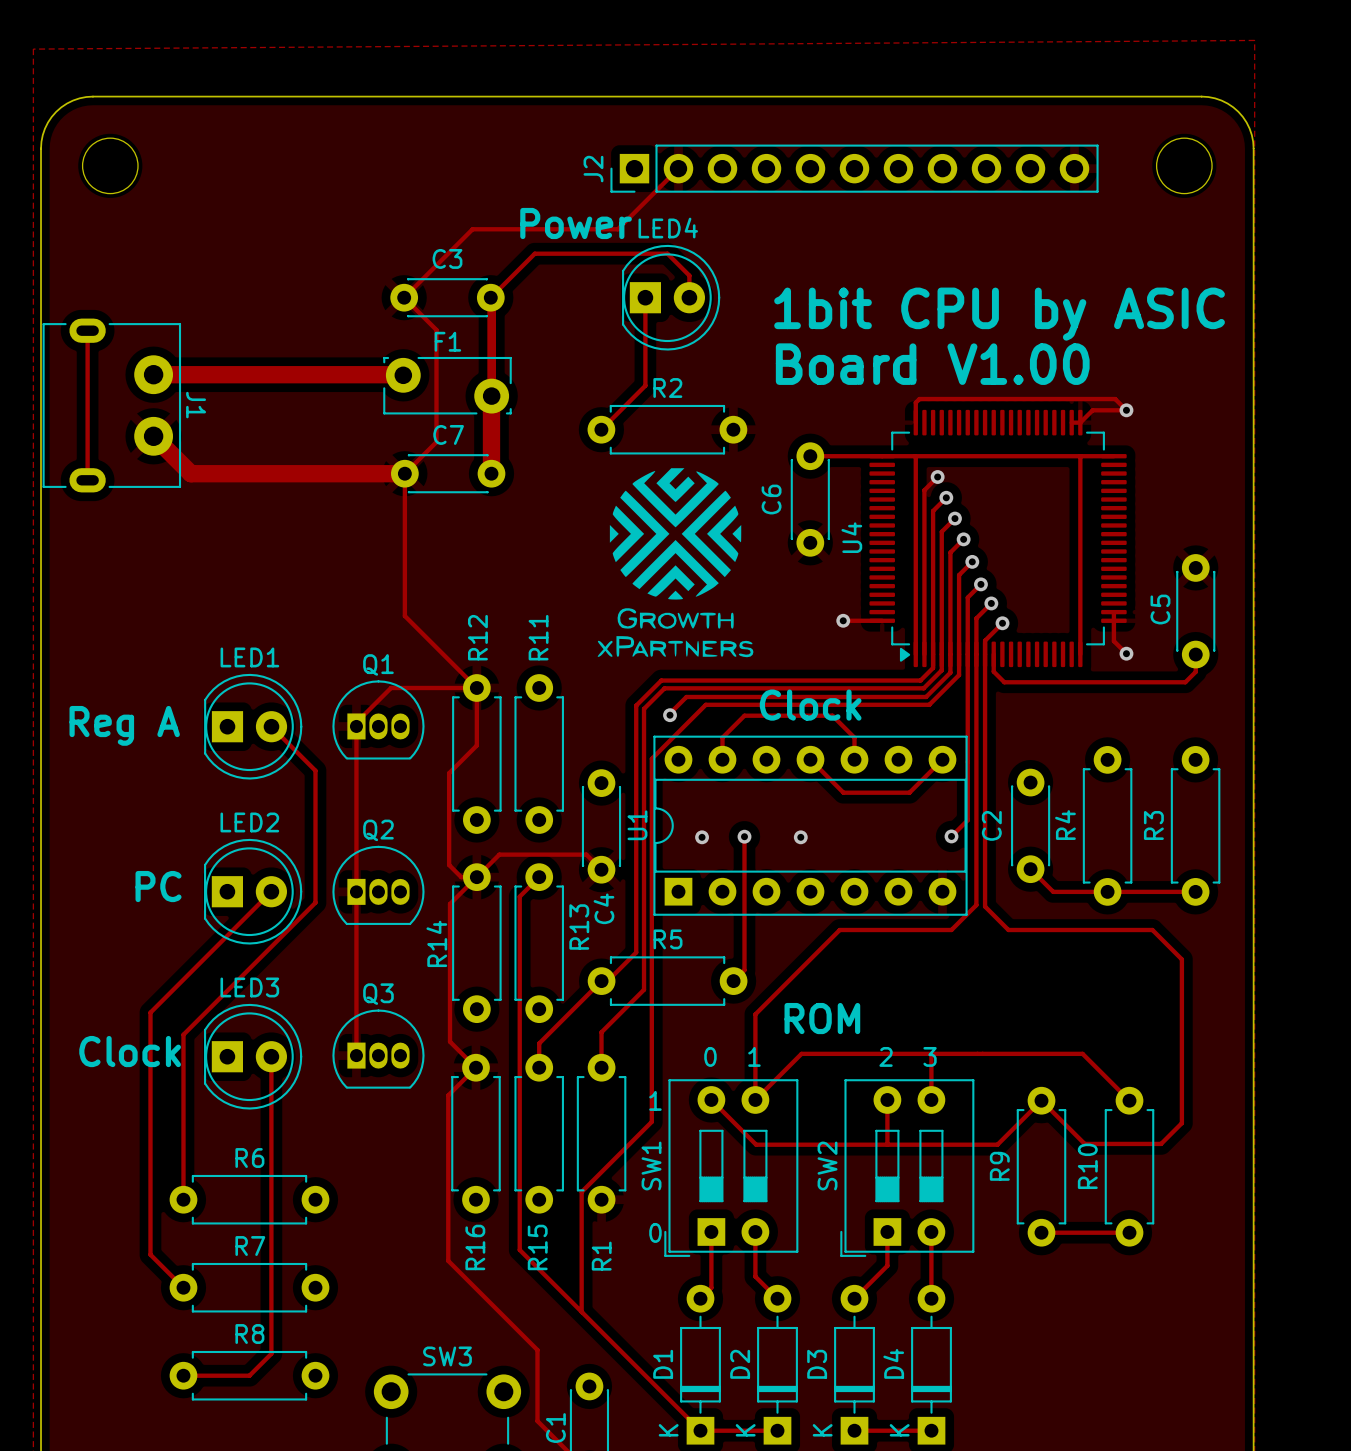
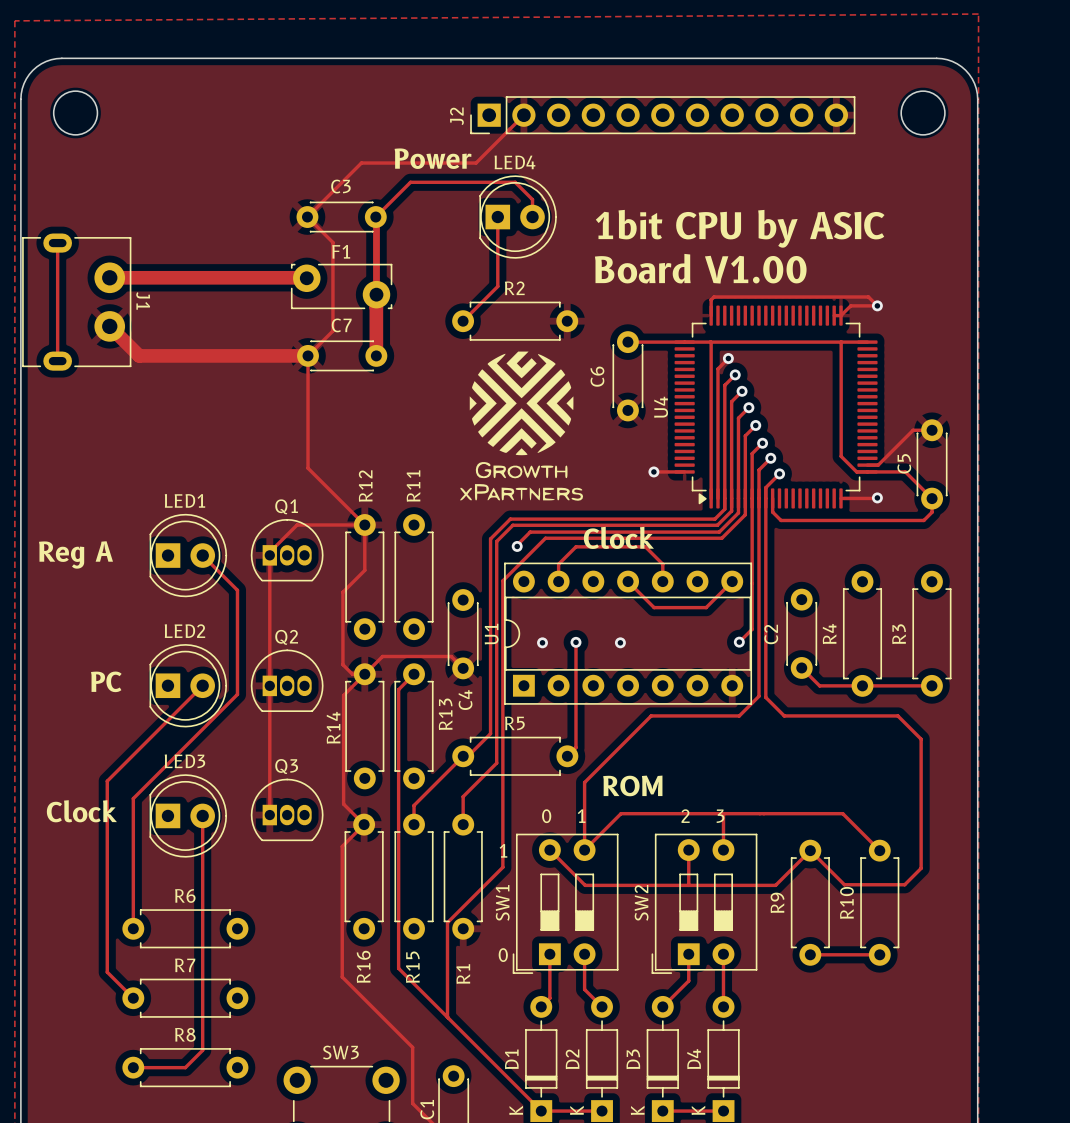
track: (1080, 456) (1080, 654) -> (841, 342) (841, 456) (856, 471) (905, 471) (932, 498)
track: none -> (932, 430) (913, 430) (878, 465) (867, 465)
track: (1113, 612) (1113, 641) (1126, 653) -> (841, 498) (877, 497)

